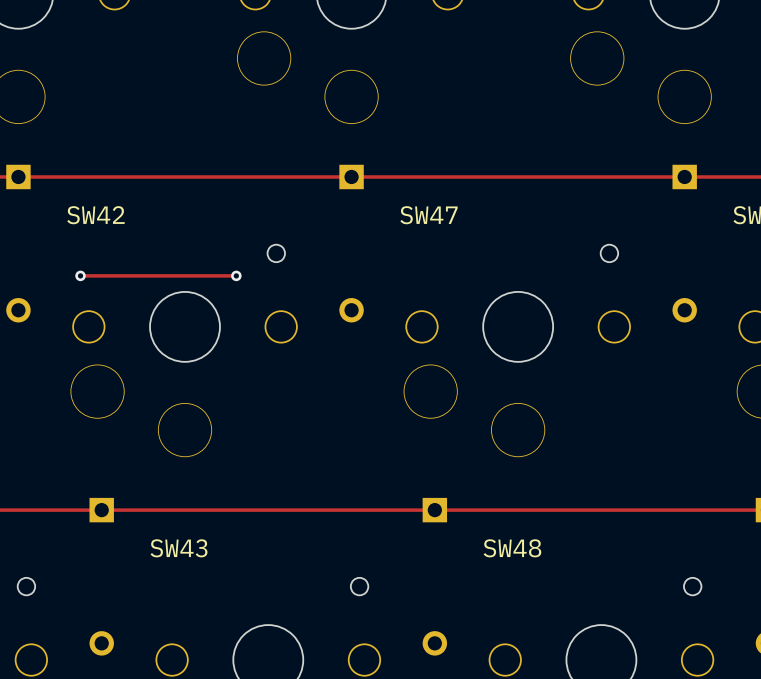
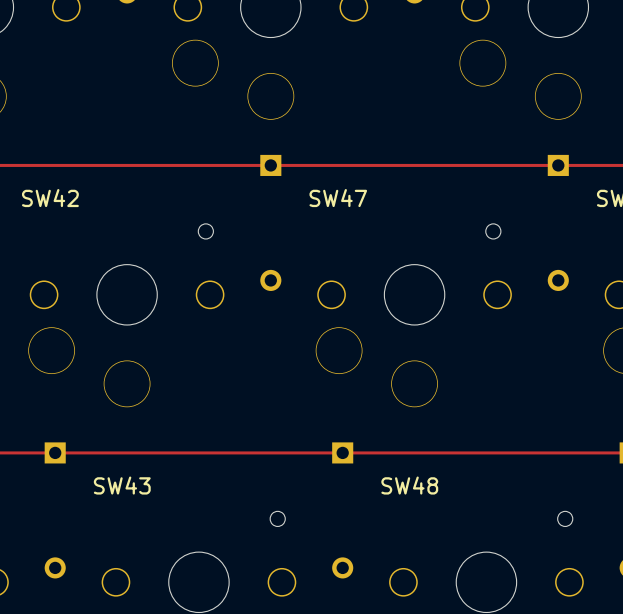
track: (80, 275) (236, 275) -> none
via: (80, 275) -> none
via: (236, 275) -> none

